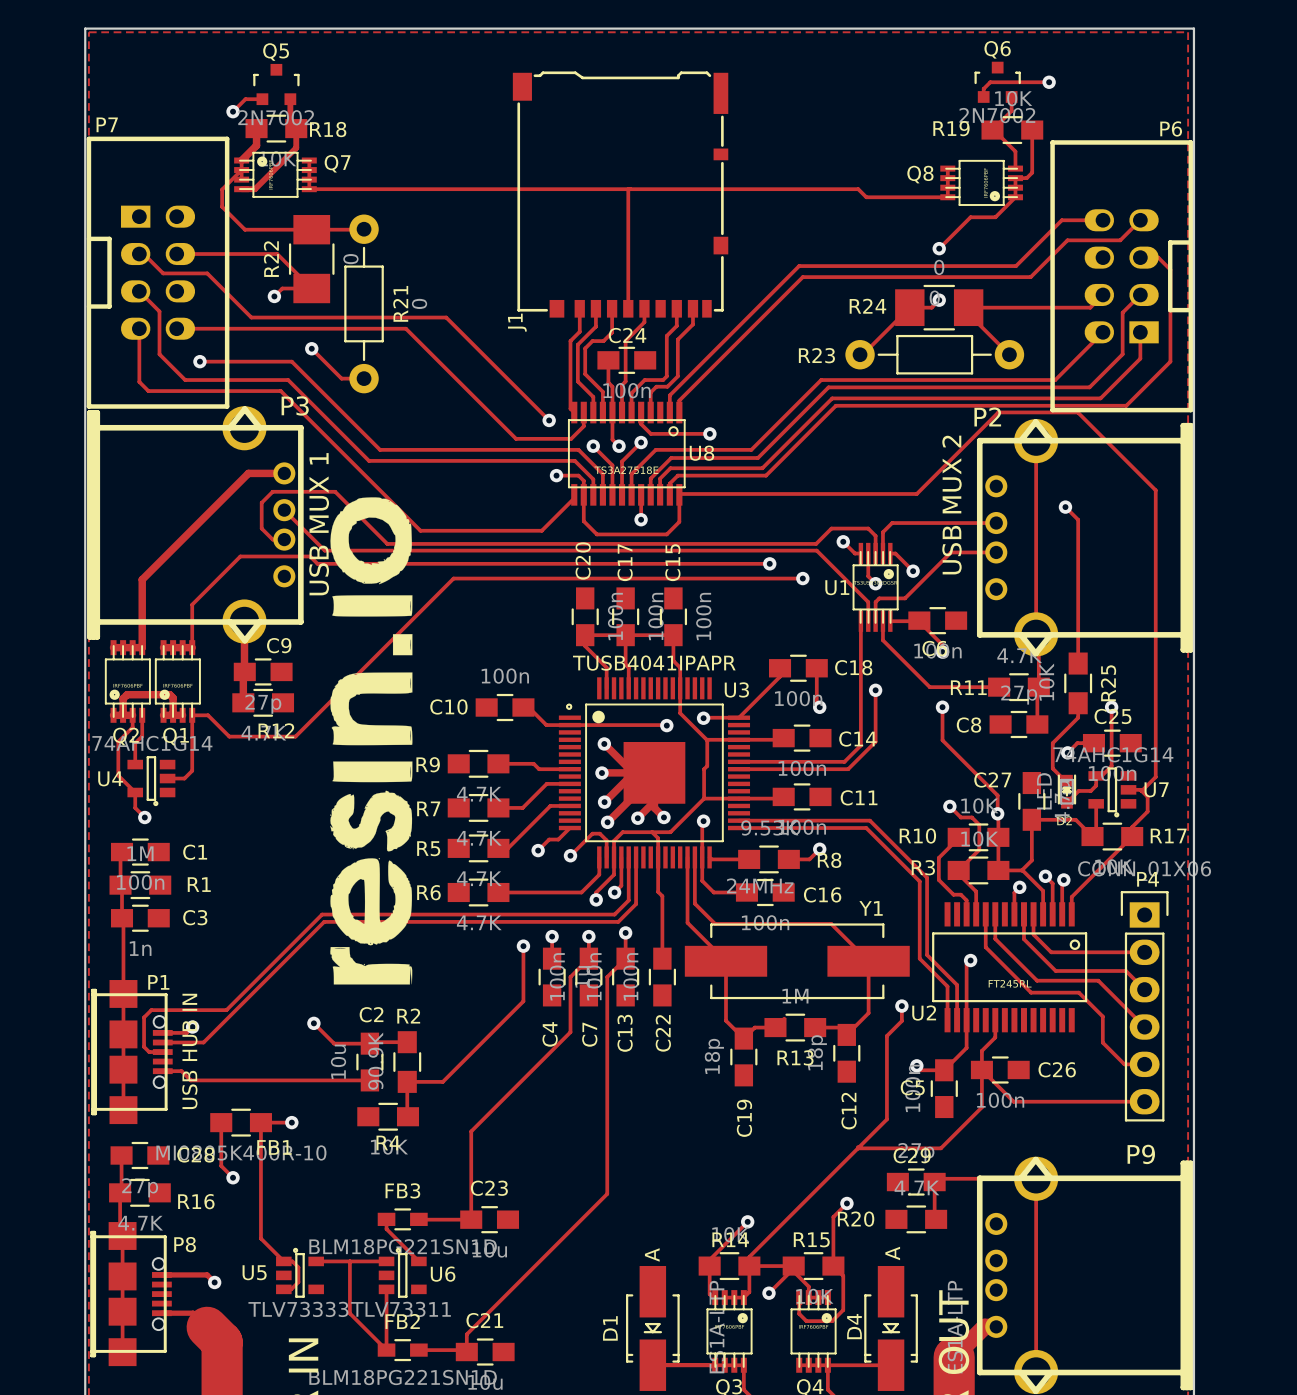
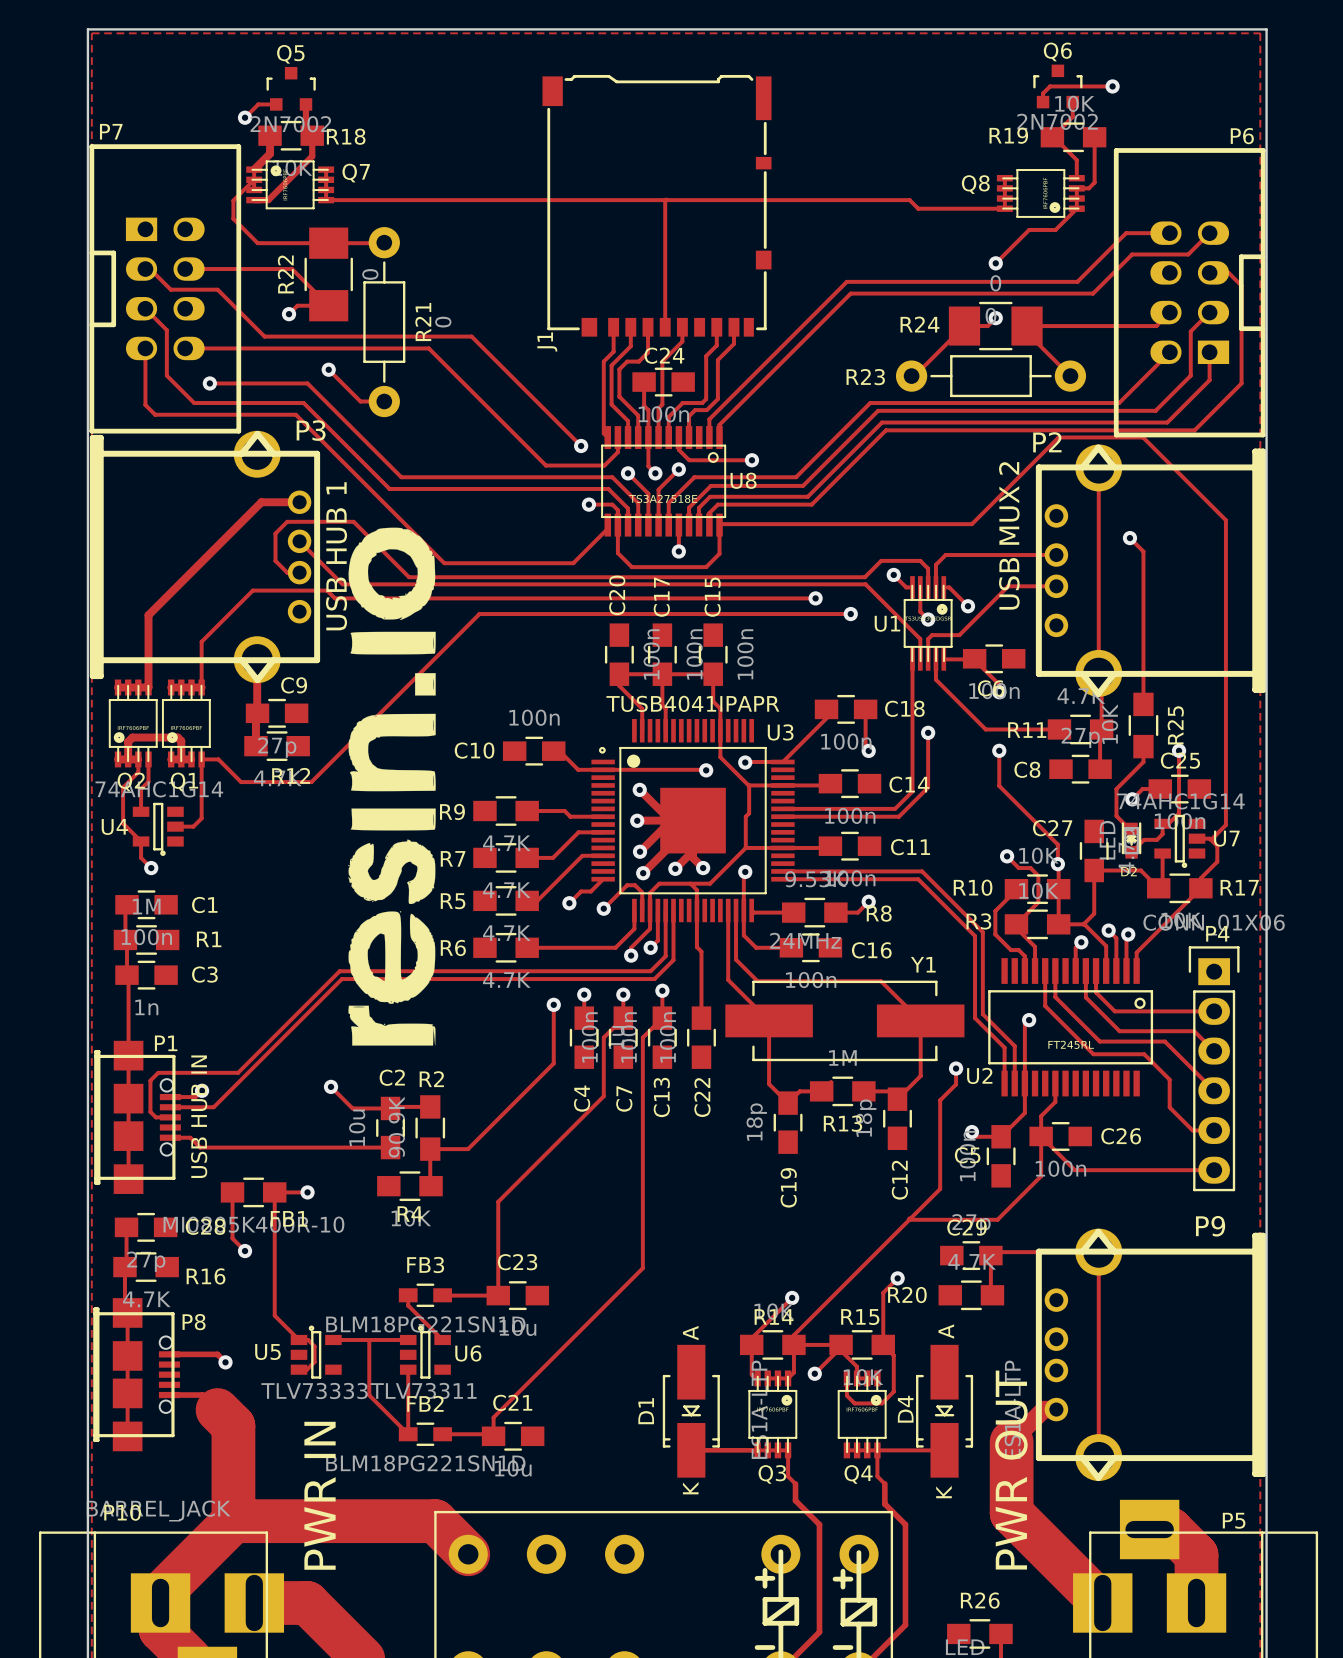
P3 value: USB MUX 1 (319, 524) -> USB HUB 1 (336, 556)

